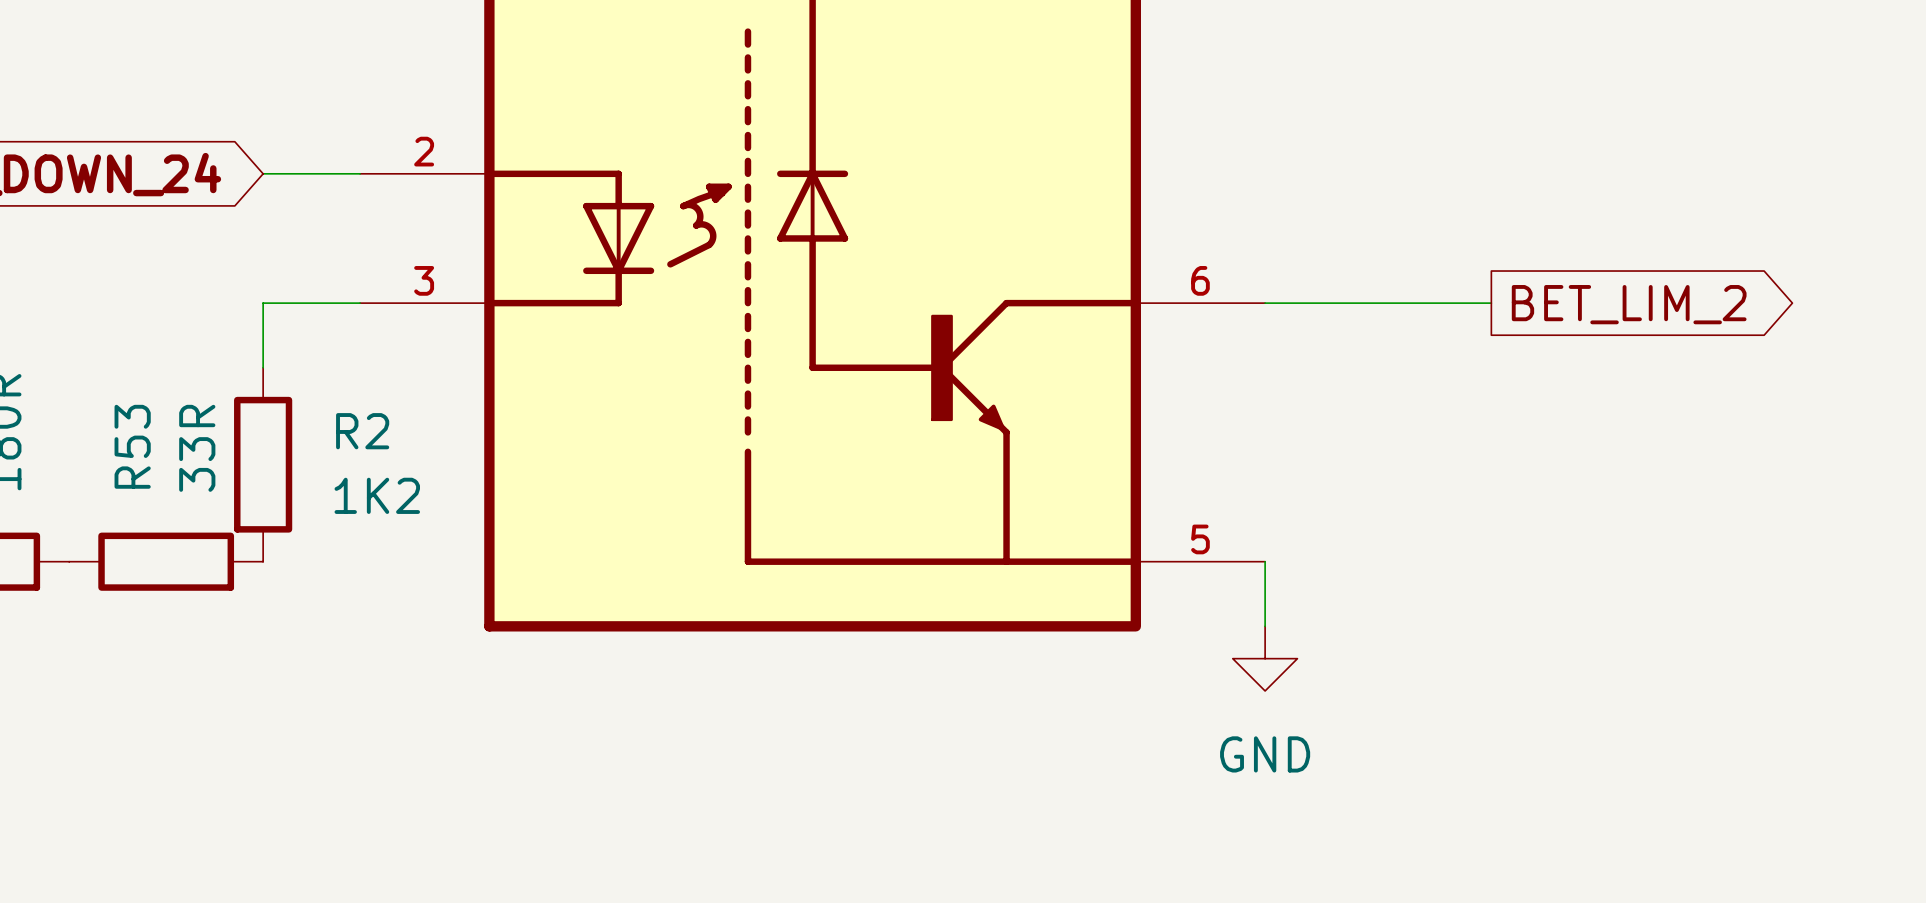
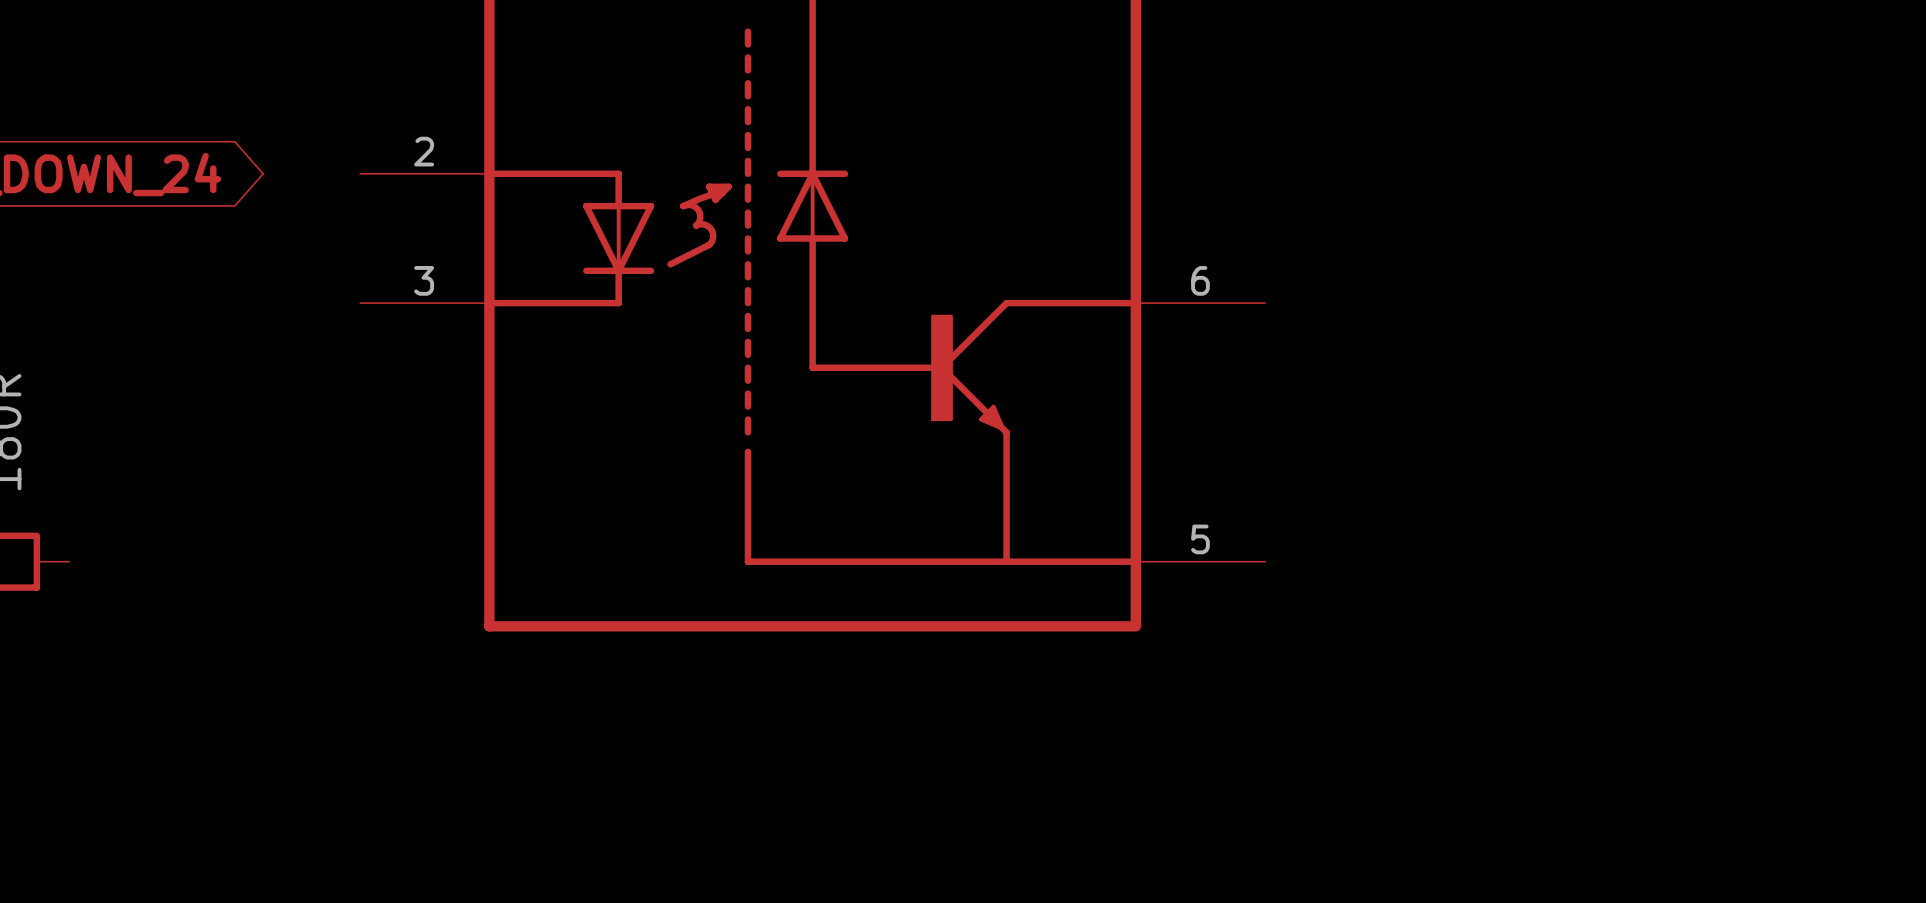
wire: (263, 173) (360, 173) -> none
wire: (360, 303) (263, 303) (263, 367) -> none
wire: (1265, 303) (1491, 303) -> none
global label: BET_LIM_2 (1629, 304) -> none
R2: 1K2 (263, 464) -> none
R53: 33R (166, 561) -> none
wire: (1265, 561) (1265, 626) -> none
power symbol: GND (1265, 658) -> none

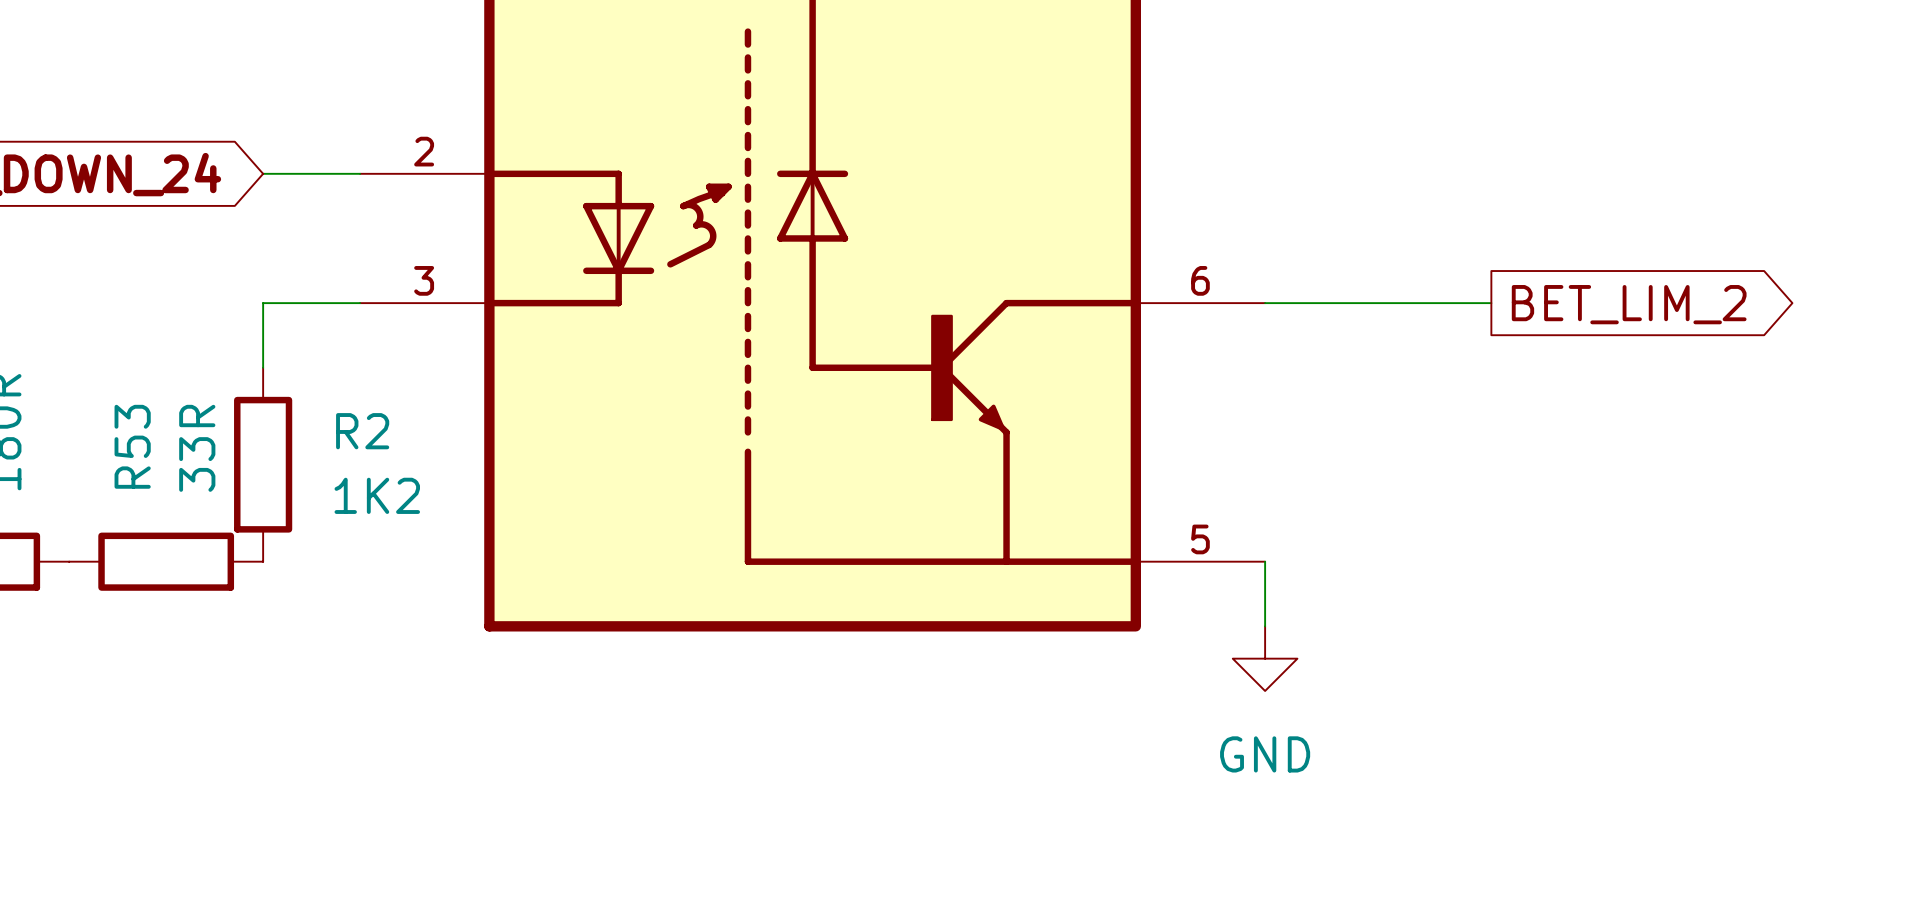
wire: none -> (263, 173) (360, 173)
wire: none -> (360, 303) (263, 303) (263, 367)
wire: none -> (1265, 303) (1491, 303)
global label: none -> BET_LIM_2 (1629, 304)
R2: none -> 1K2 (263, 464)
R53: none -> 33R (166, 561)
wire: none -> (1265, 561) (1265, 626)
power symbol: none -> GND (1265, 658)

